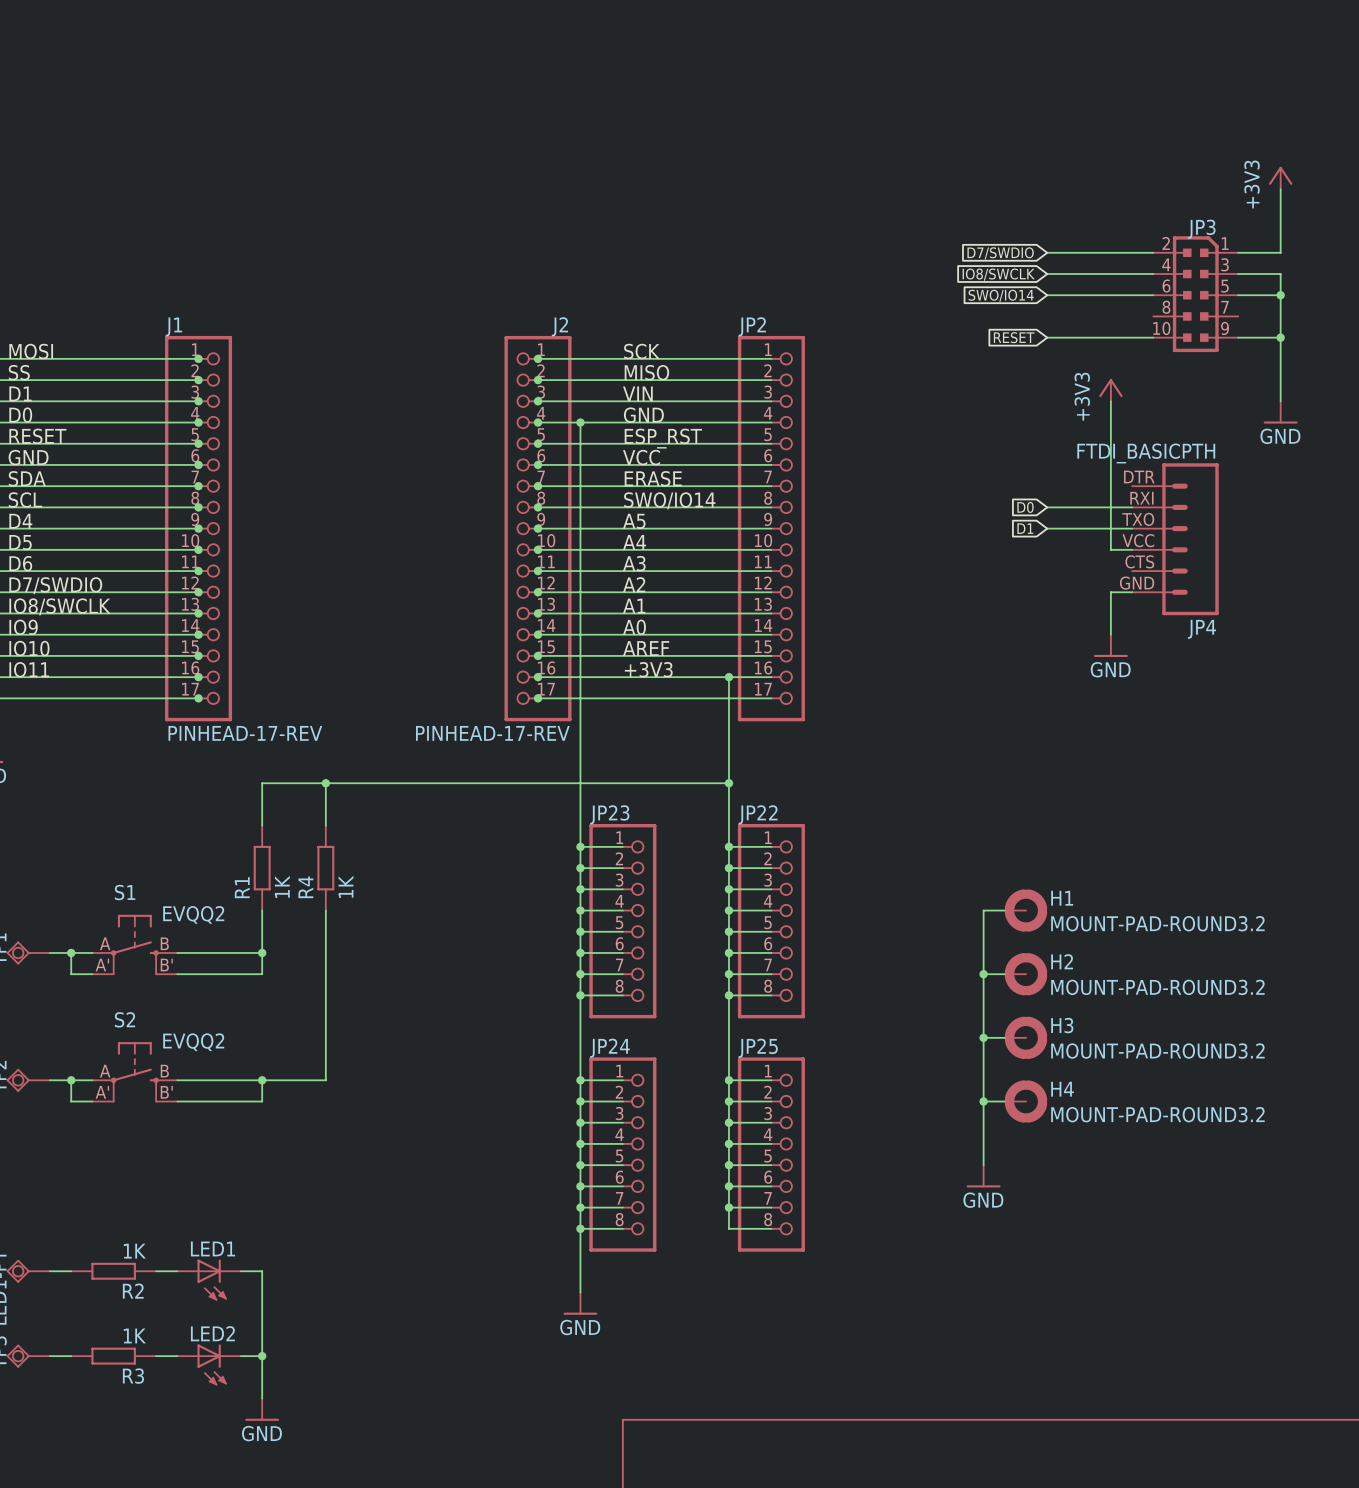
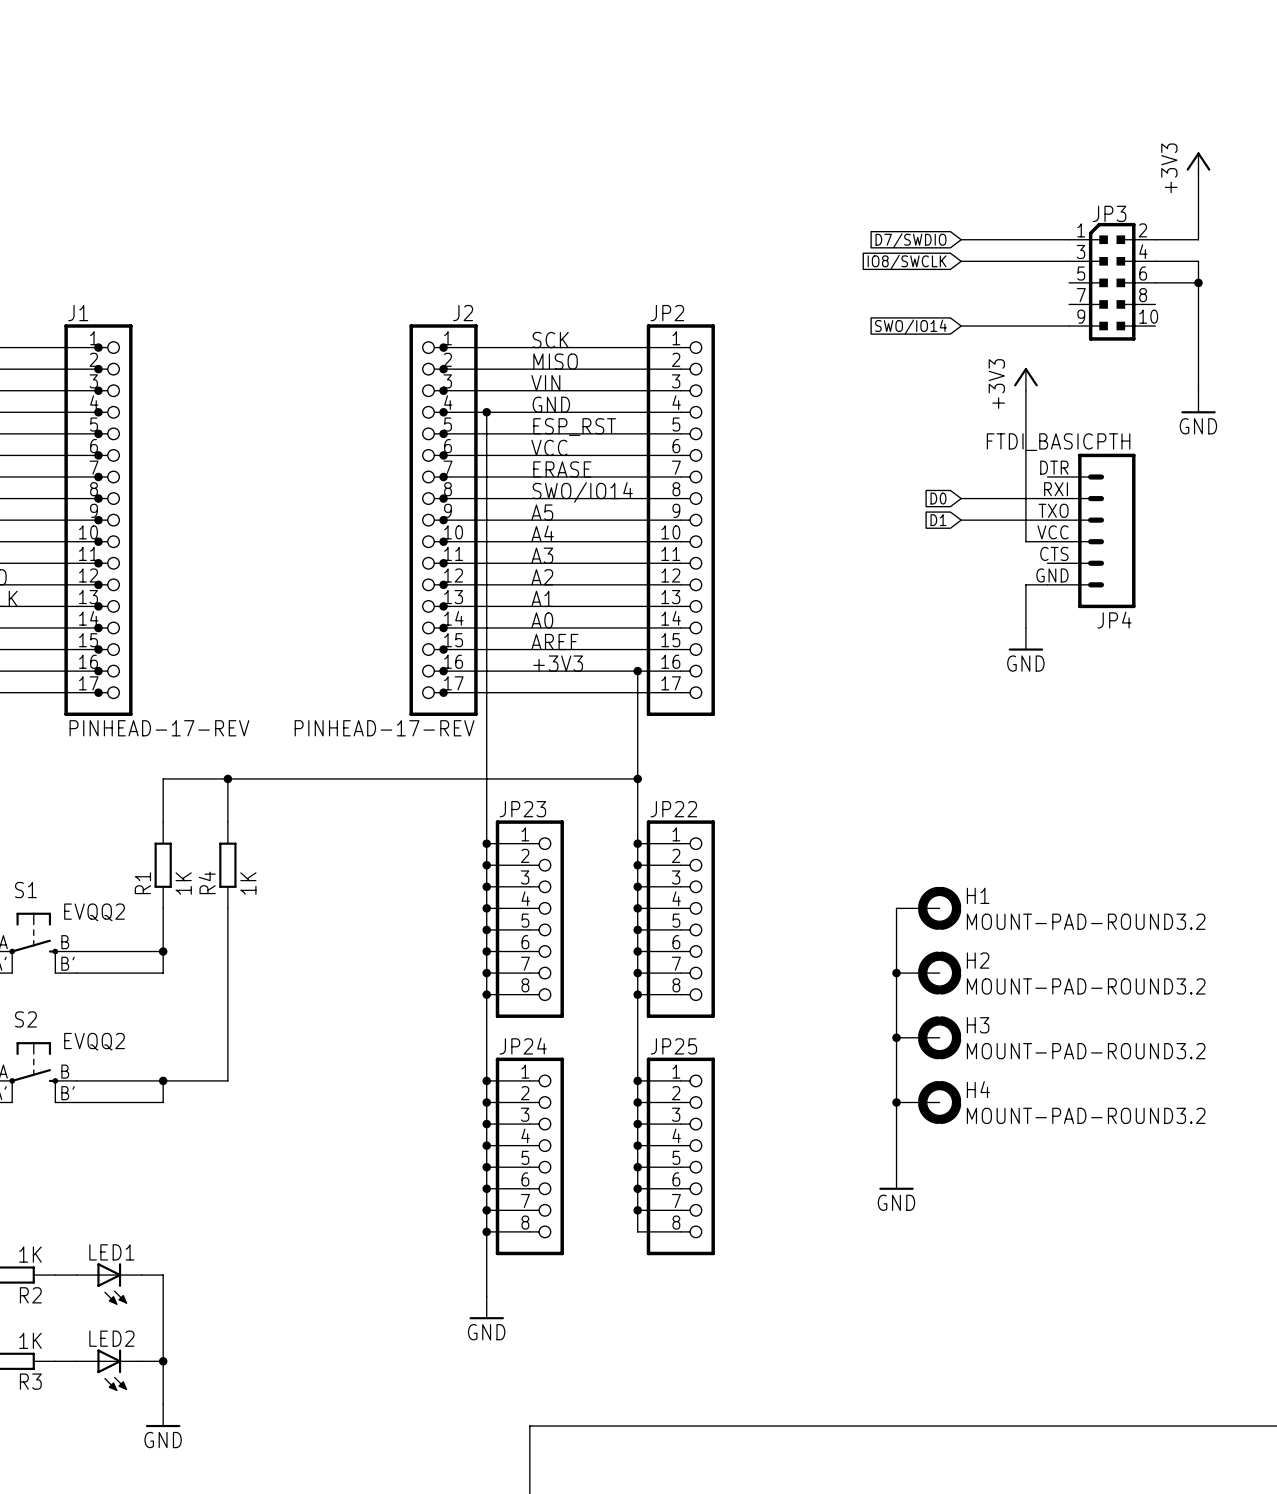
JP3 flip: as is (1195, 294) -> left-right (1112, 281)
global label: SWO/IO14 (1001, 295) -> none
wire: (1047, 295) (1153, 295) -> none
global label: RESET (1014, 337) -> SWO/IO14 (910, 327)
wire: (1238, 337) (1280, 337) -> none
junction: (1280, 337) -> none

